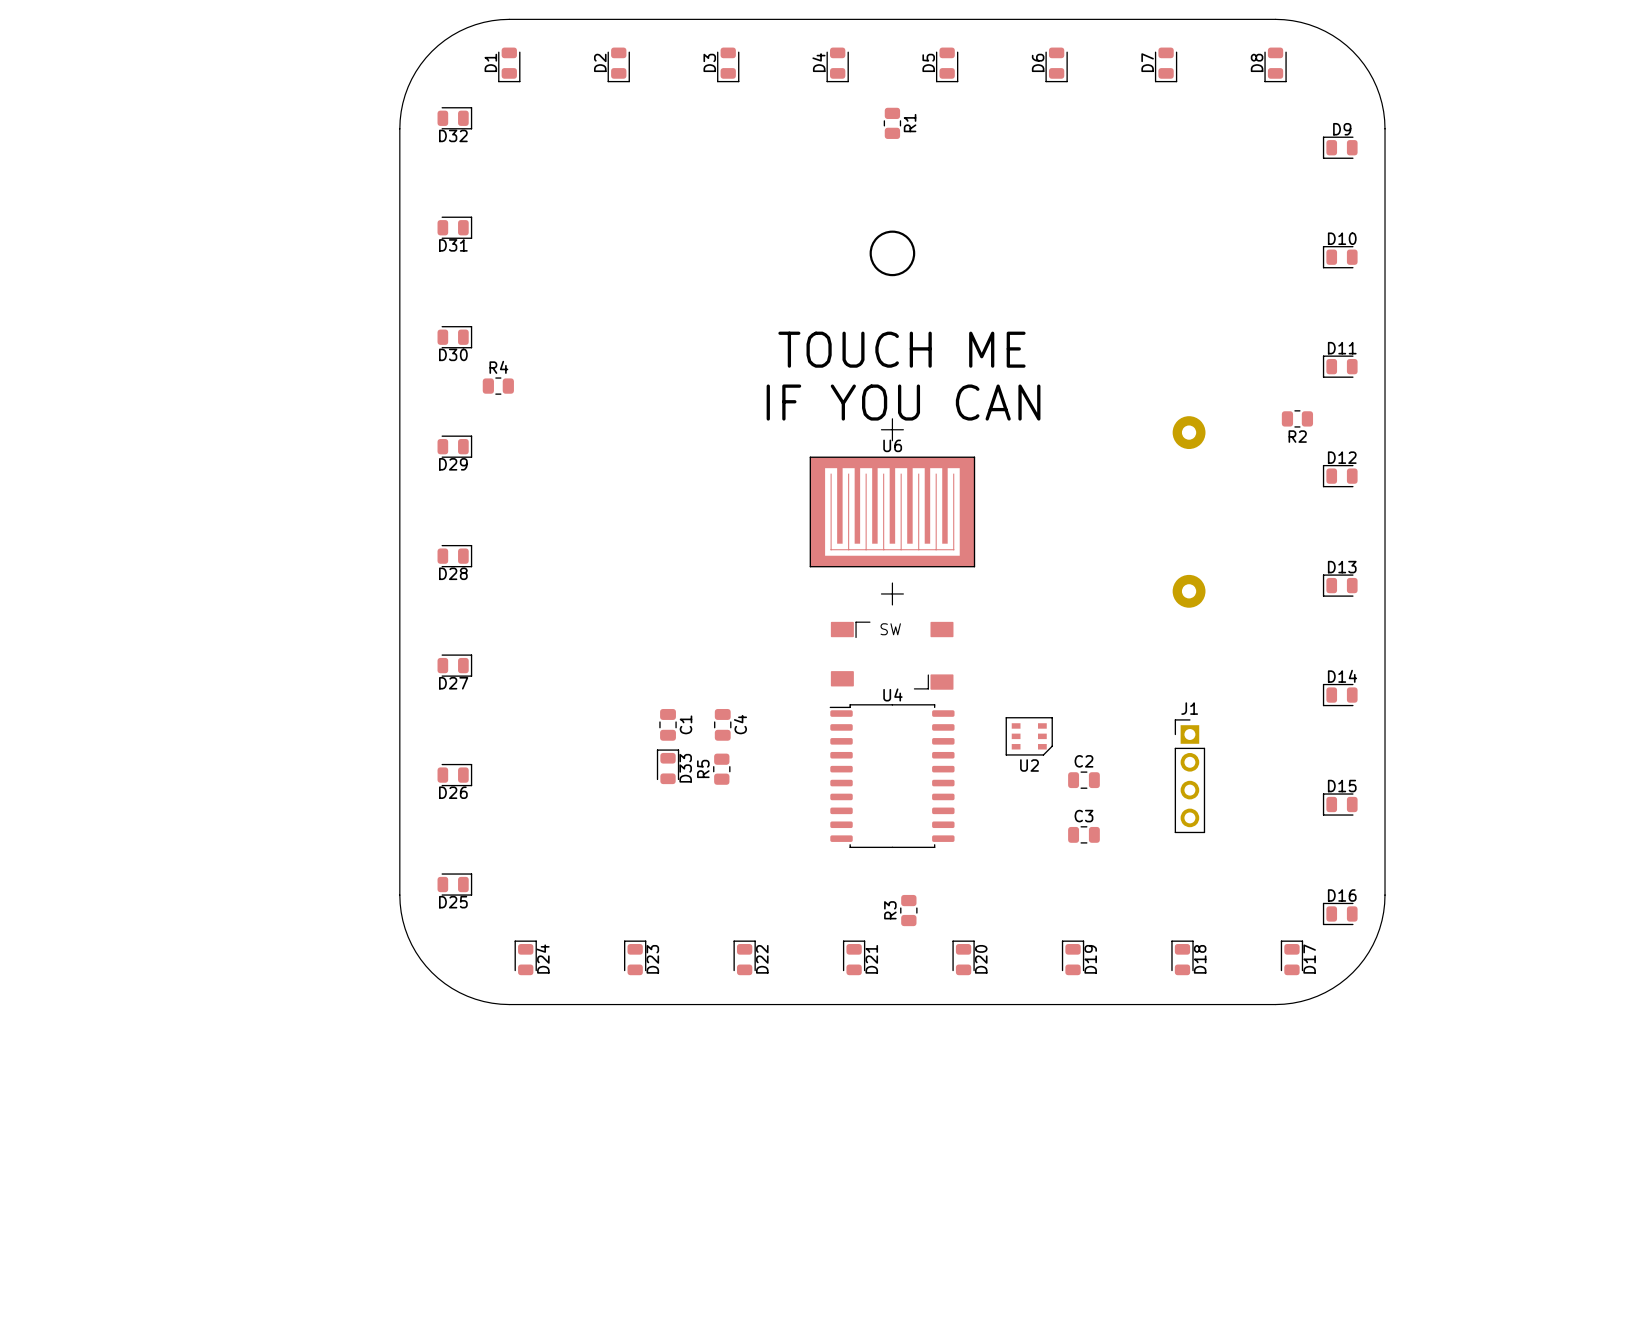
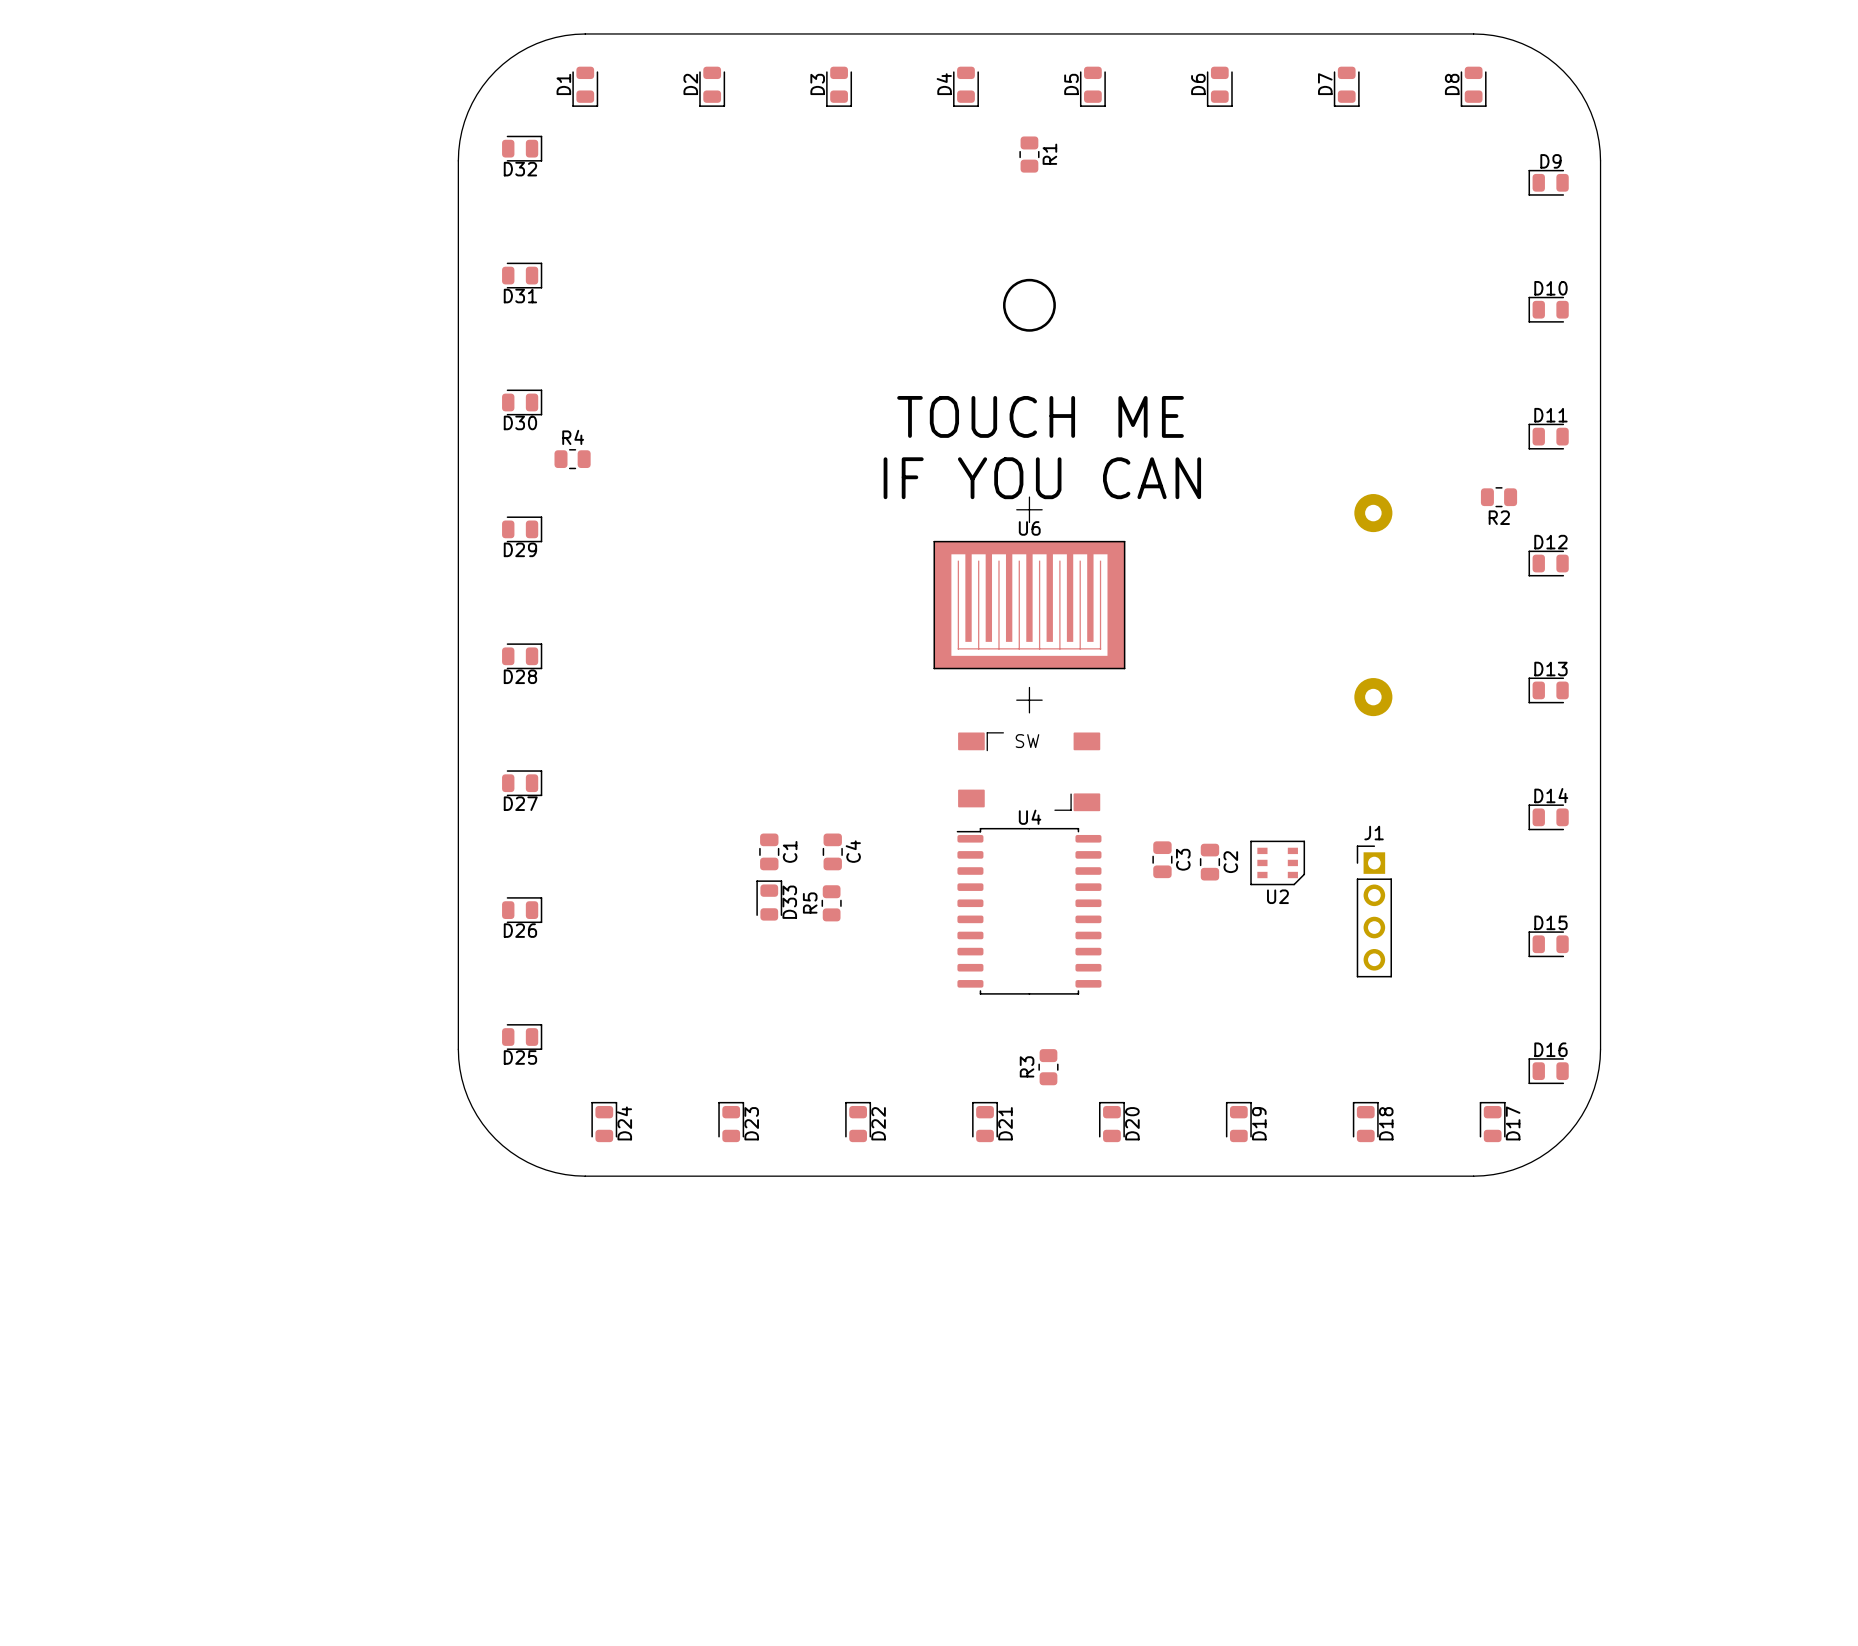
U2 position: (1029, 736) -> (1277, 862)
C2 rotation: 0° (1083, 780) -> 90° clockwise (1209, 862)
C2 position: (1083, 780) -> (1209, 862)
C3 rotation: 0° (1083, 834) -> 90° clockwise (1162, 859)
C3 position: (1083, 834) -> (1162, 859)

